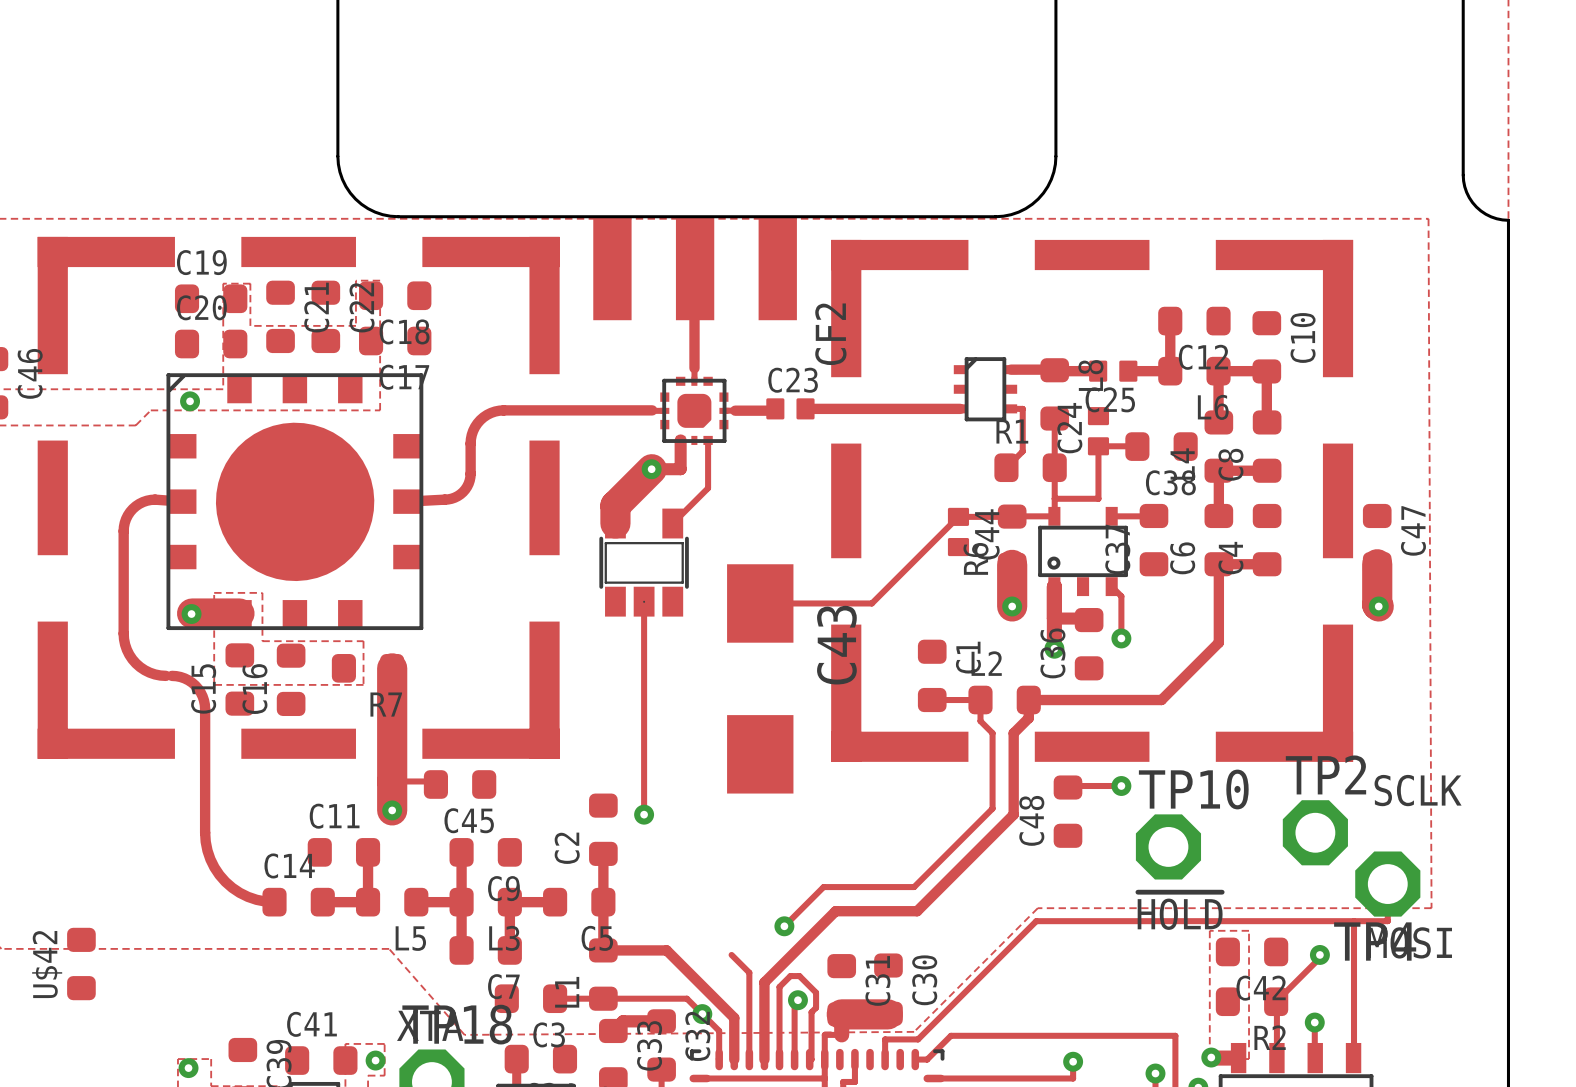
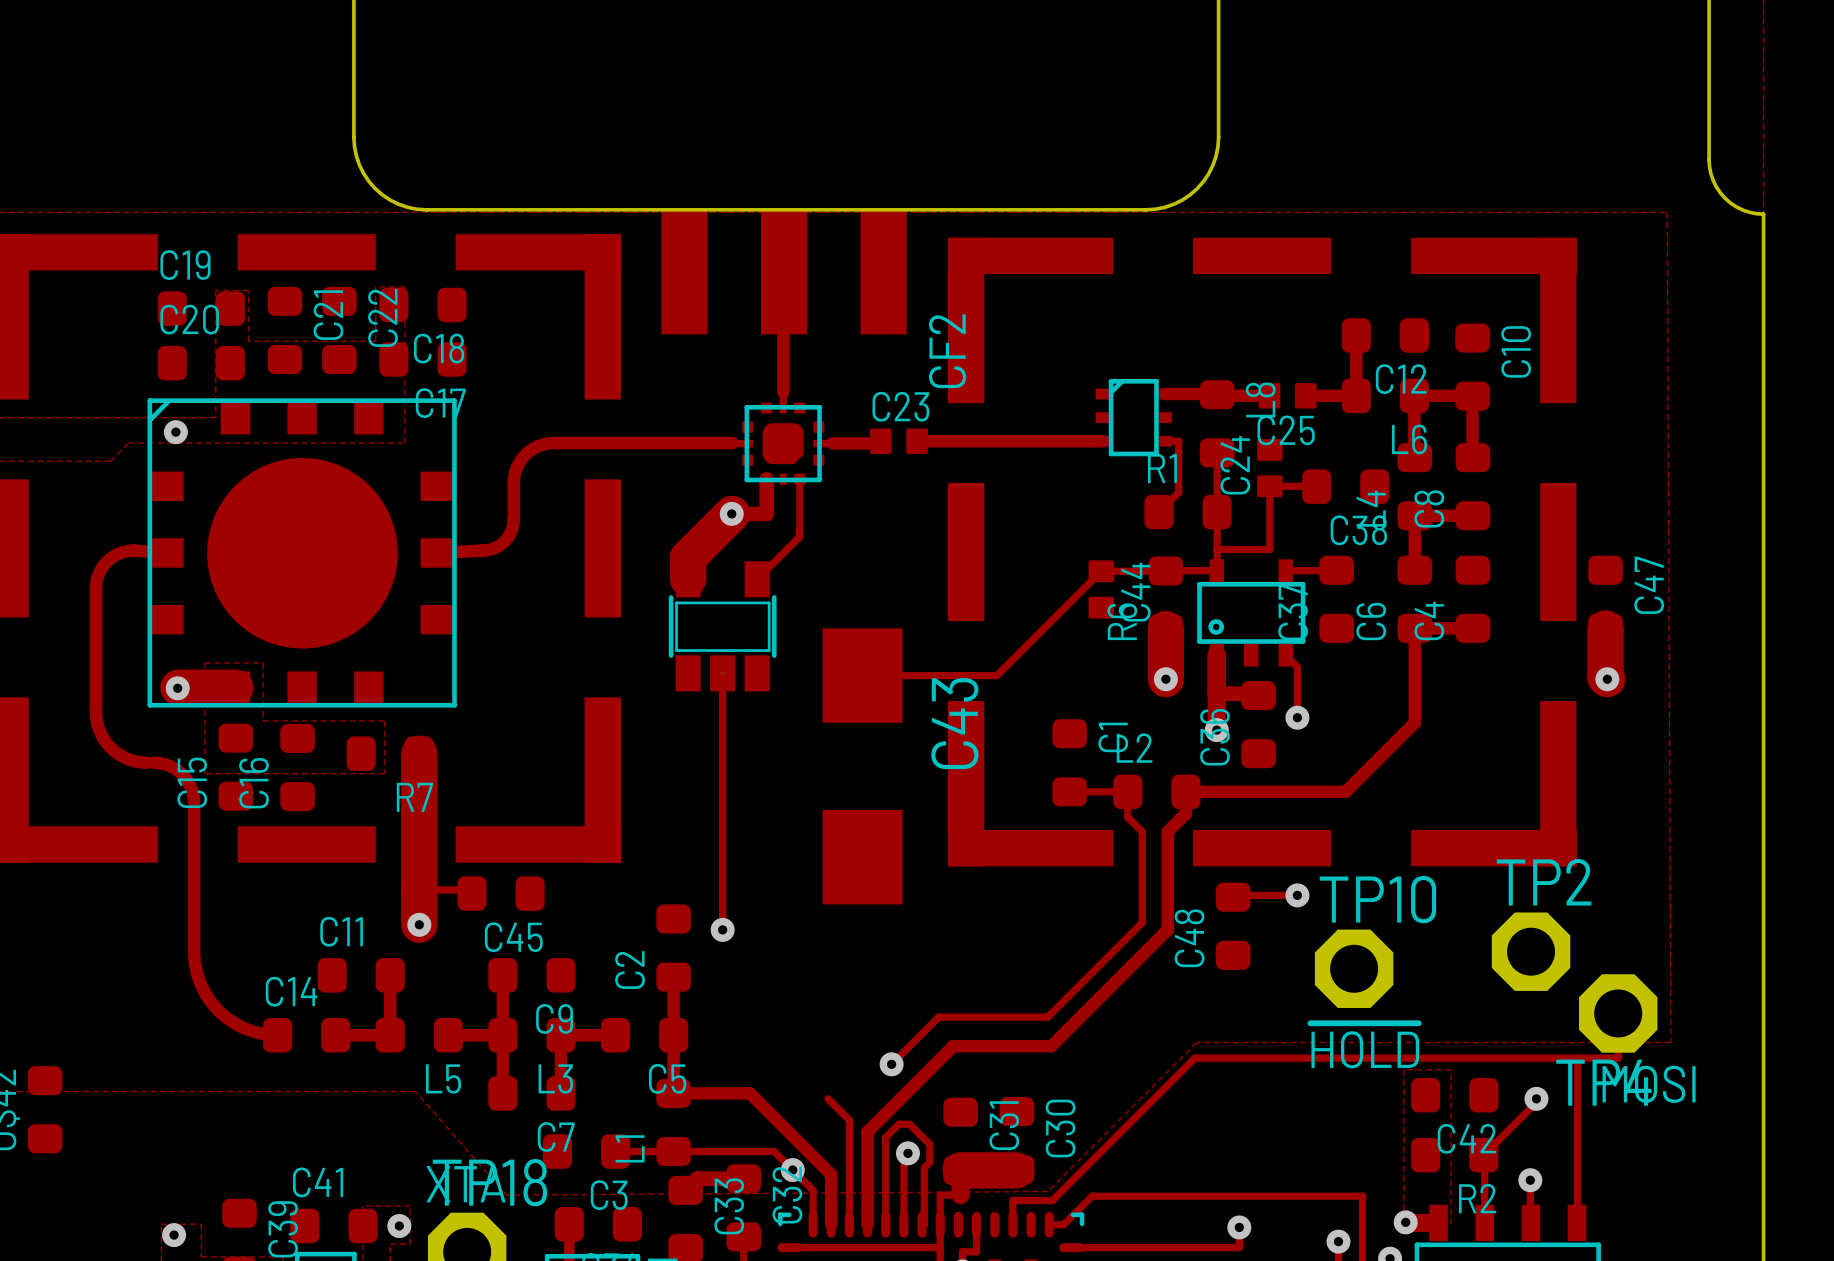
text: SCLK (1418, 790) -> none

